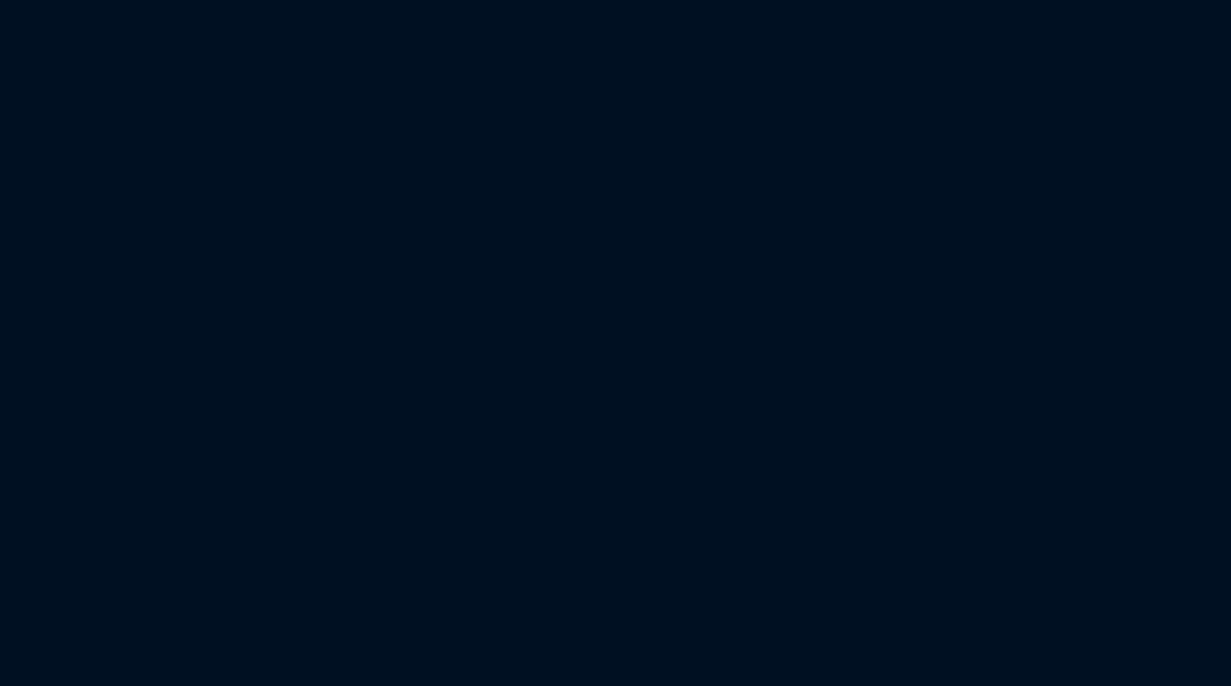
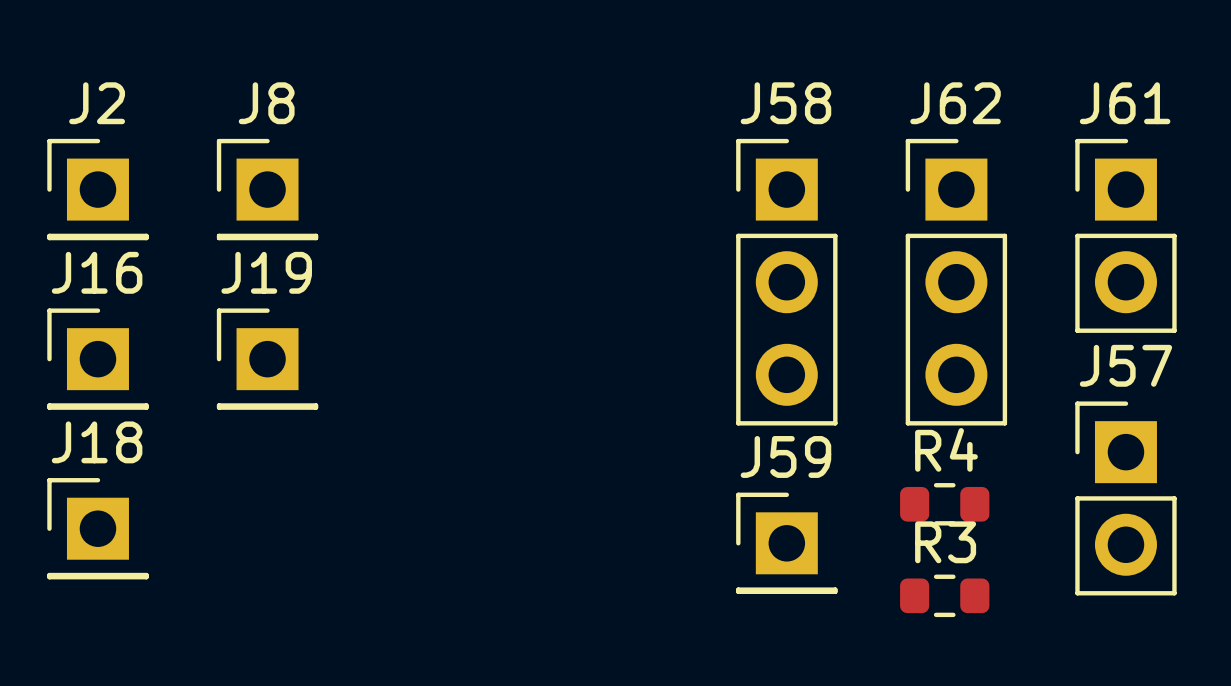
J2: none -> (97, 189)
J8: none -> (267, 189)
J61: none -> (1125, 235)
J58: none -> (786, 282)
J62: none -> (956, 282)
J16: none -> (97, 359)
J19: none -> (267, 359)
J57: none -> (1125, 498)
R4: none -> (944, 504)
J18: none -> (97, 528)
J59: none -> (786, 543)
R3: none -> (944, 595)

